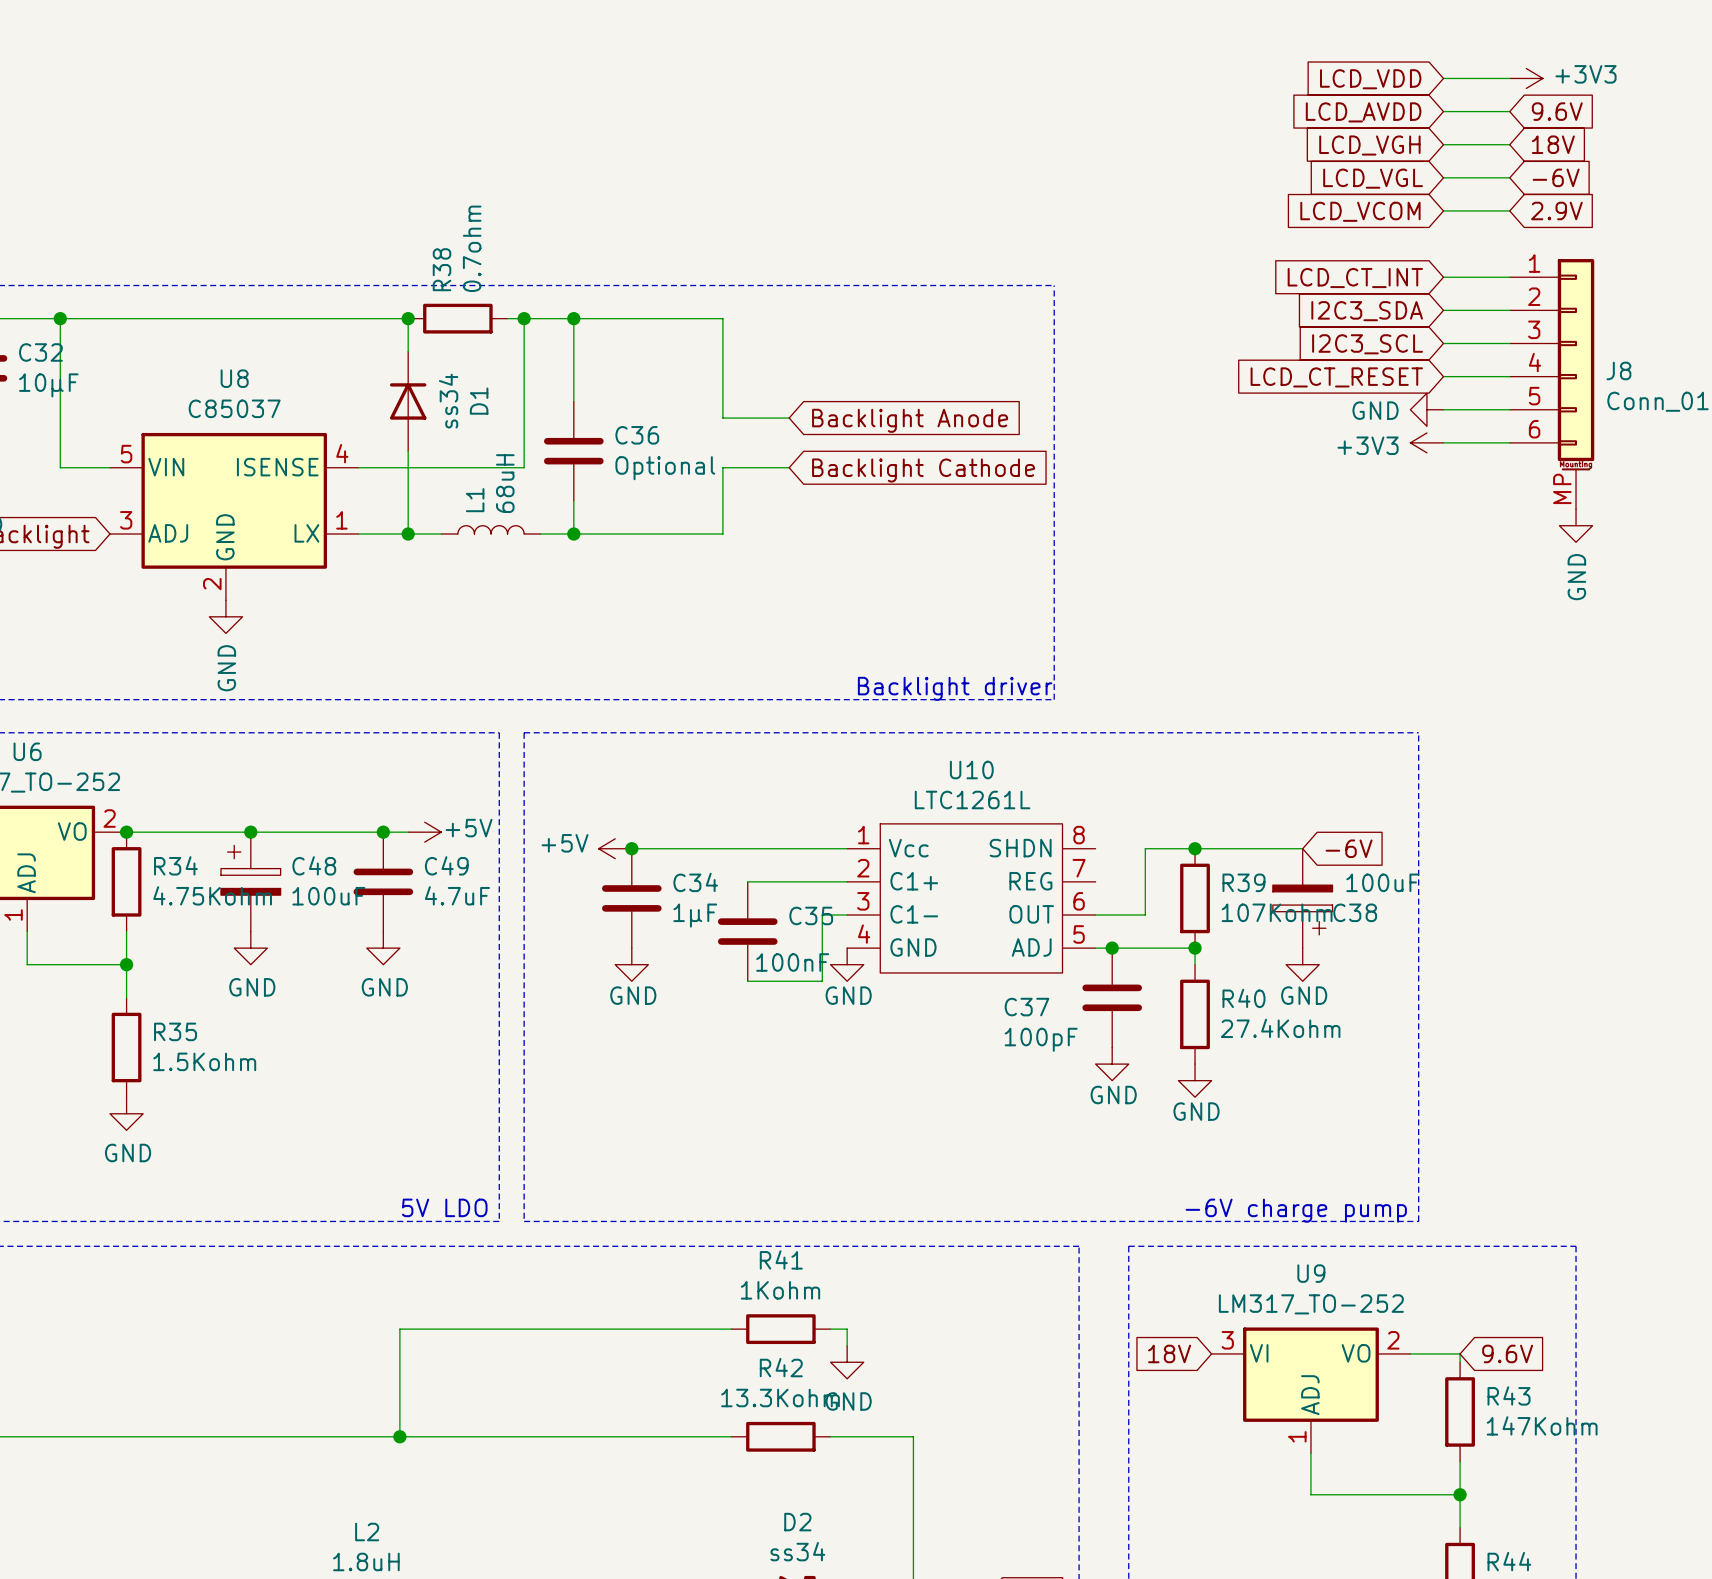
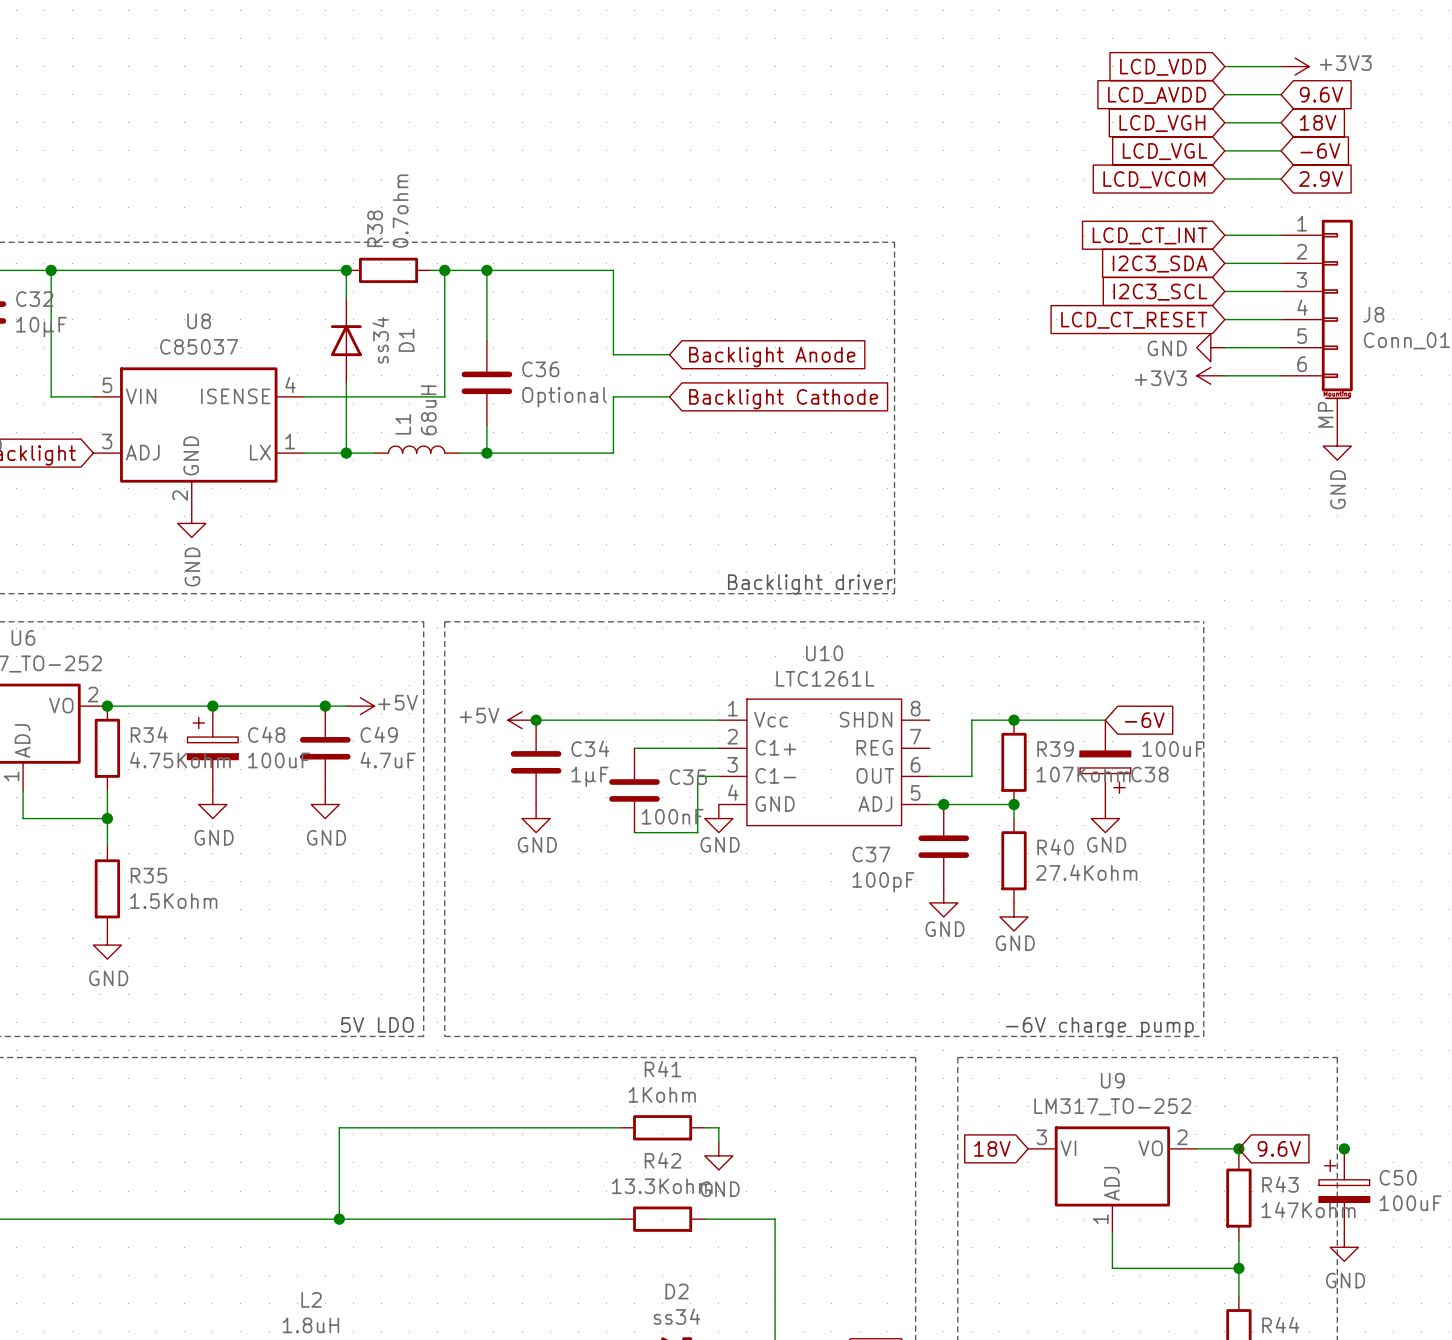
junction: none -> (1238, 1148)
junction: none -> (1344, 1148)
C50: none -> 100uF (1344, 1191)
power symbol: none -> GND (1344, 1247)

